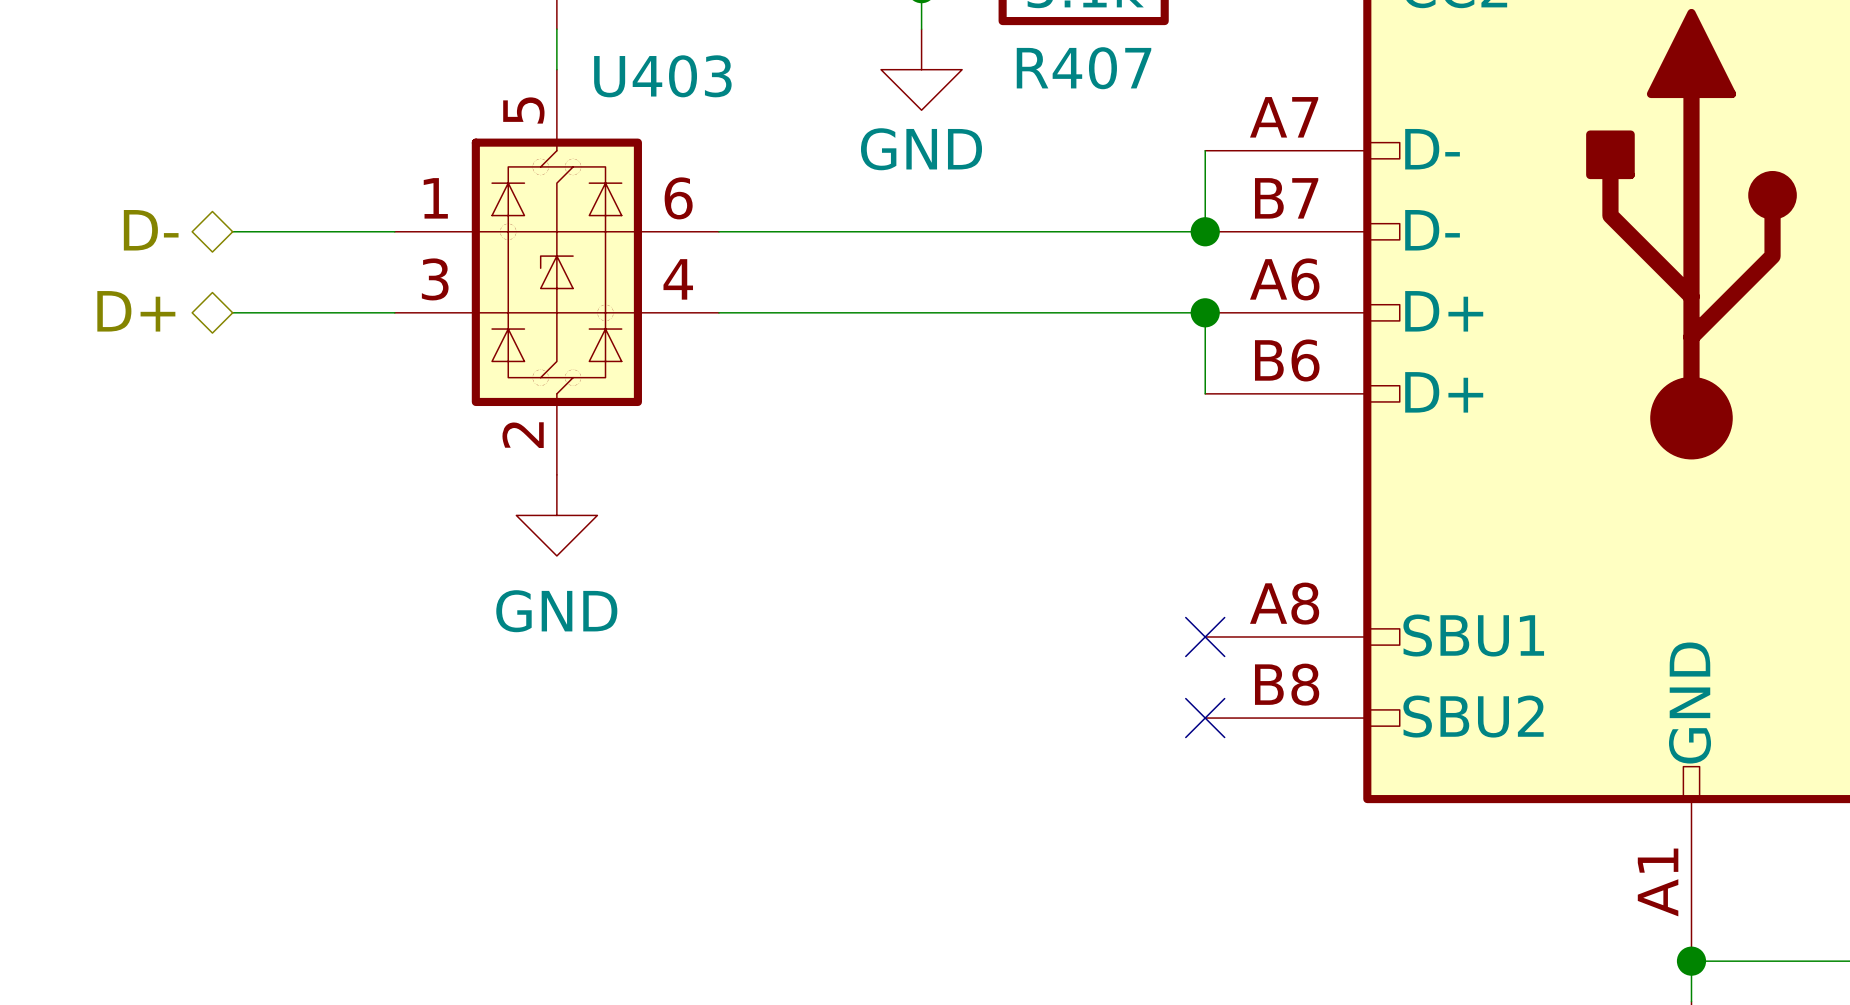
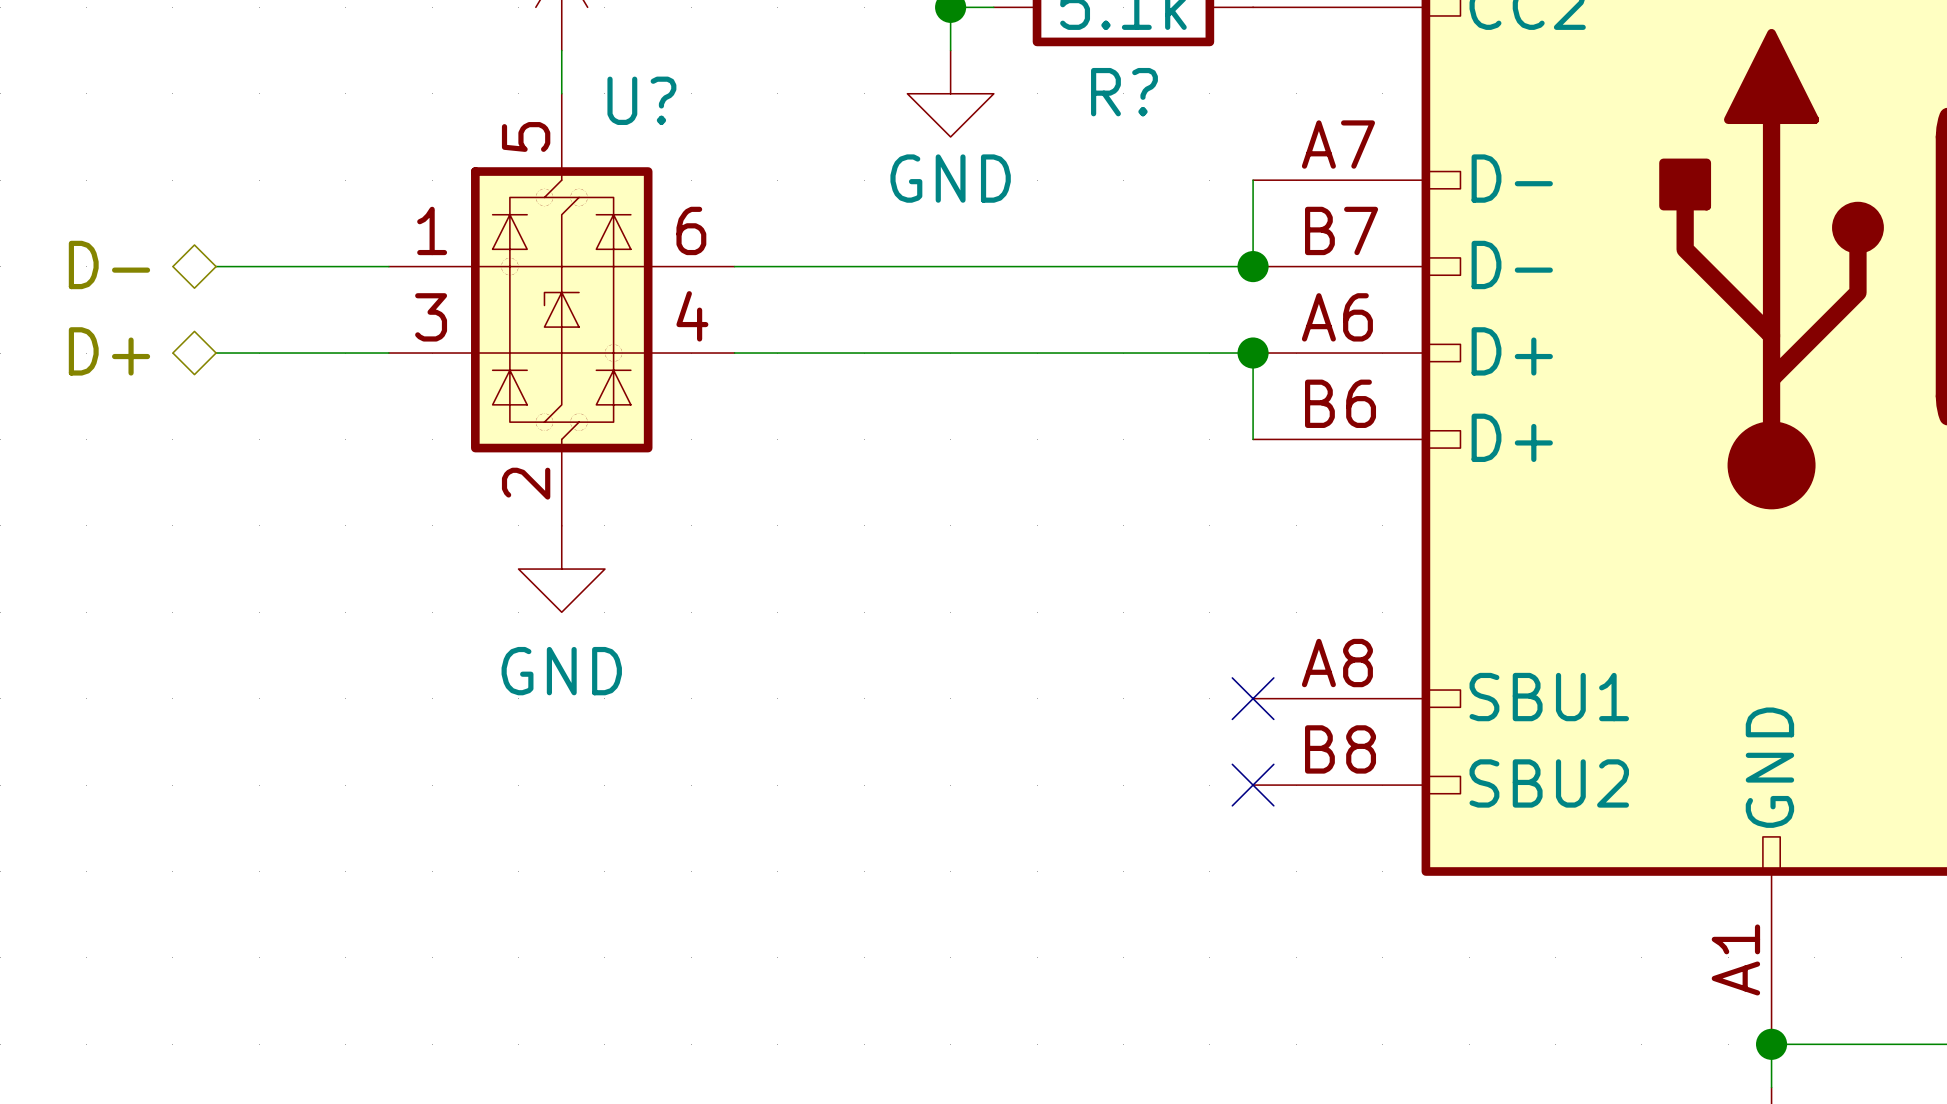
R407 name: R407 (1084, 68) -> R? (1124, 92)
U403 name: U403 (662, 76) -> U? (641, 100)

